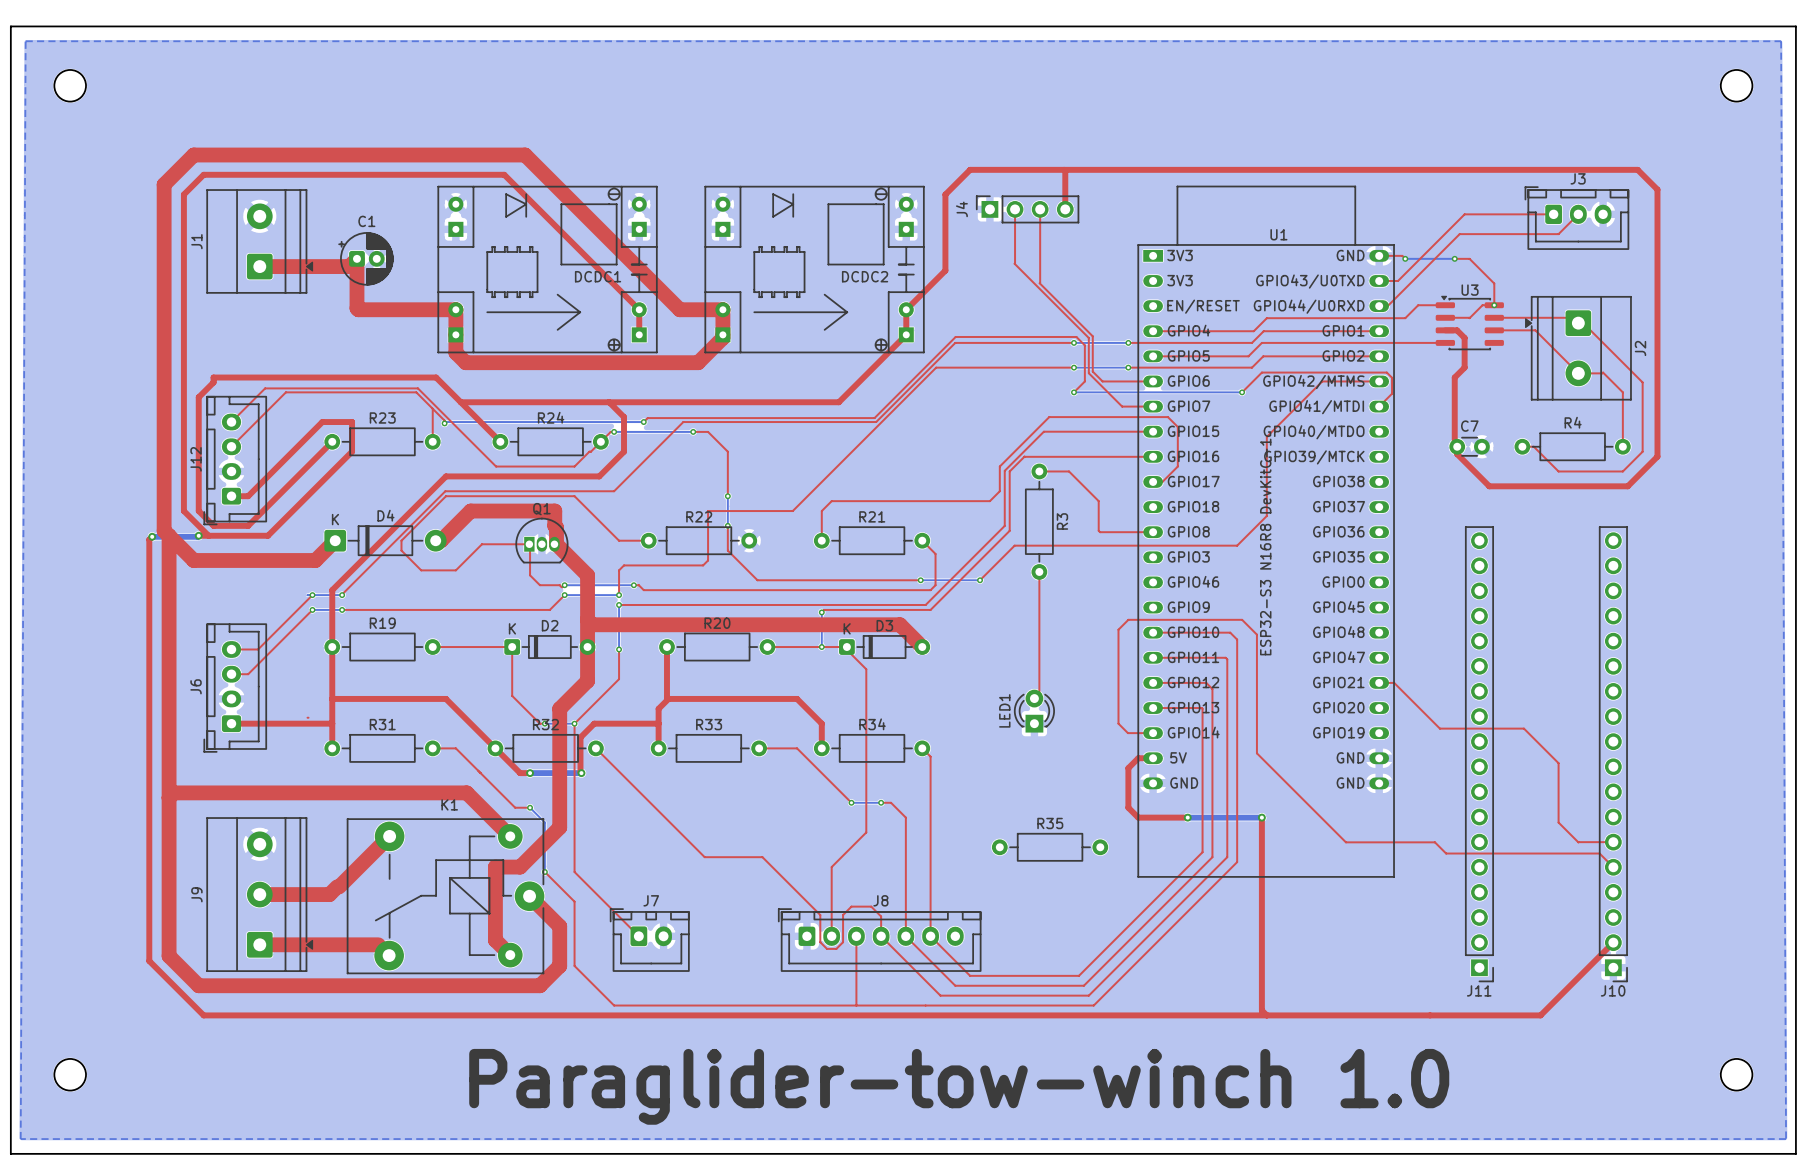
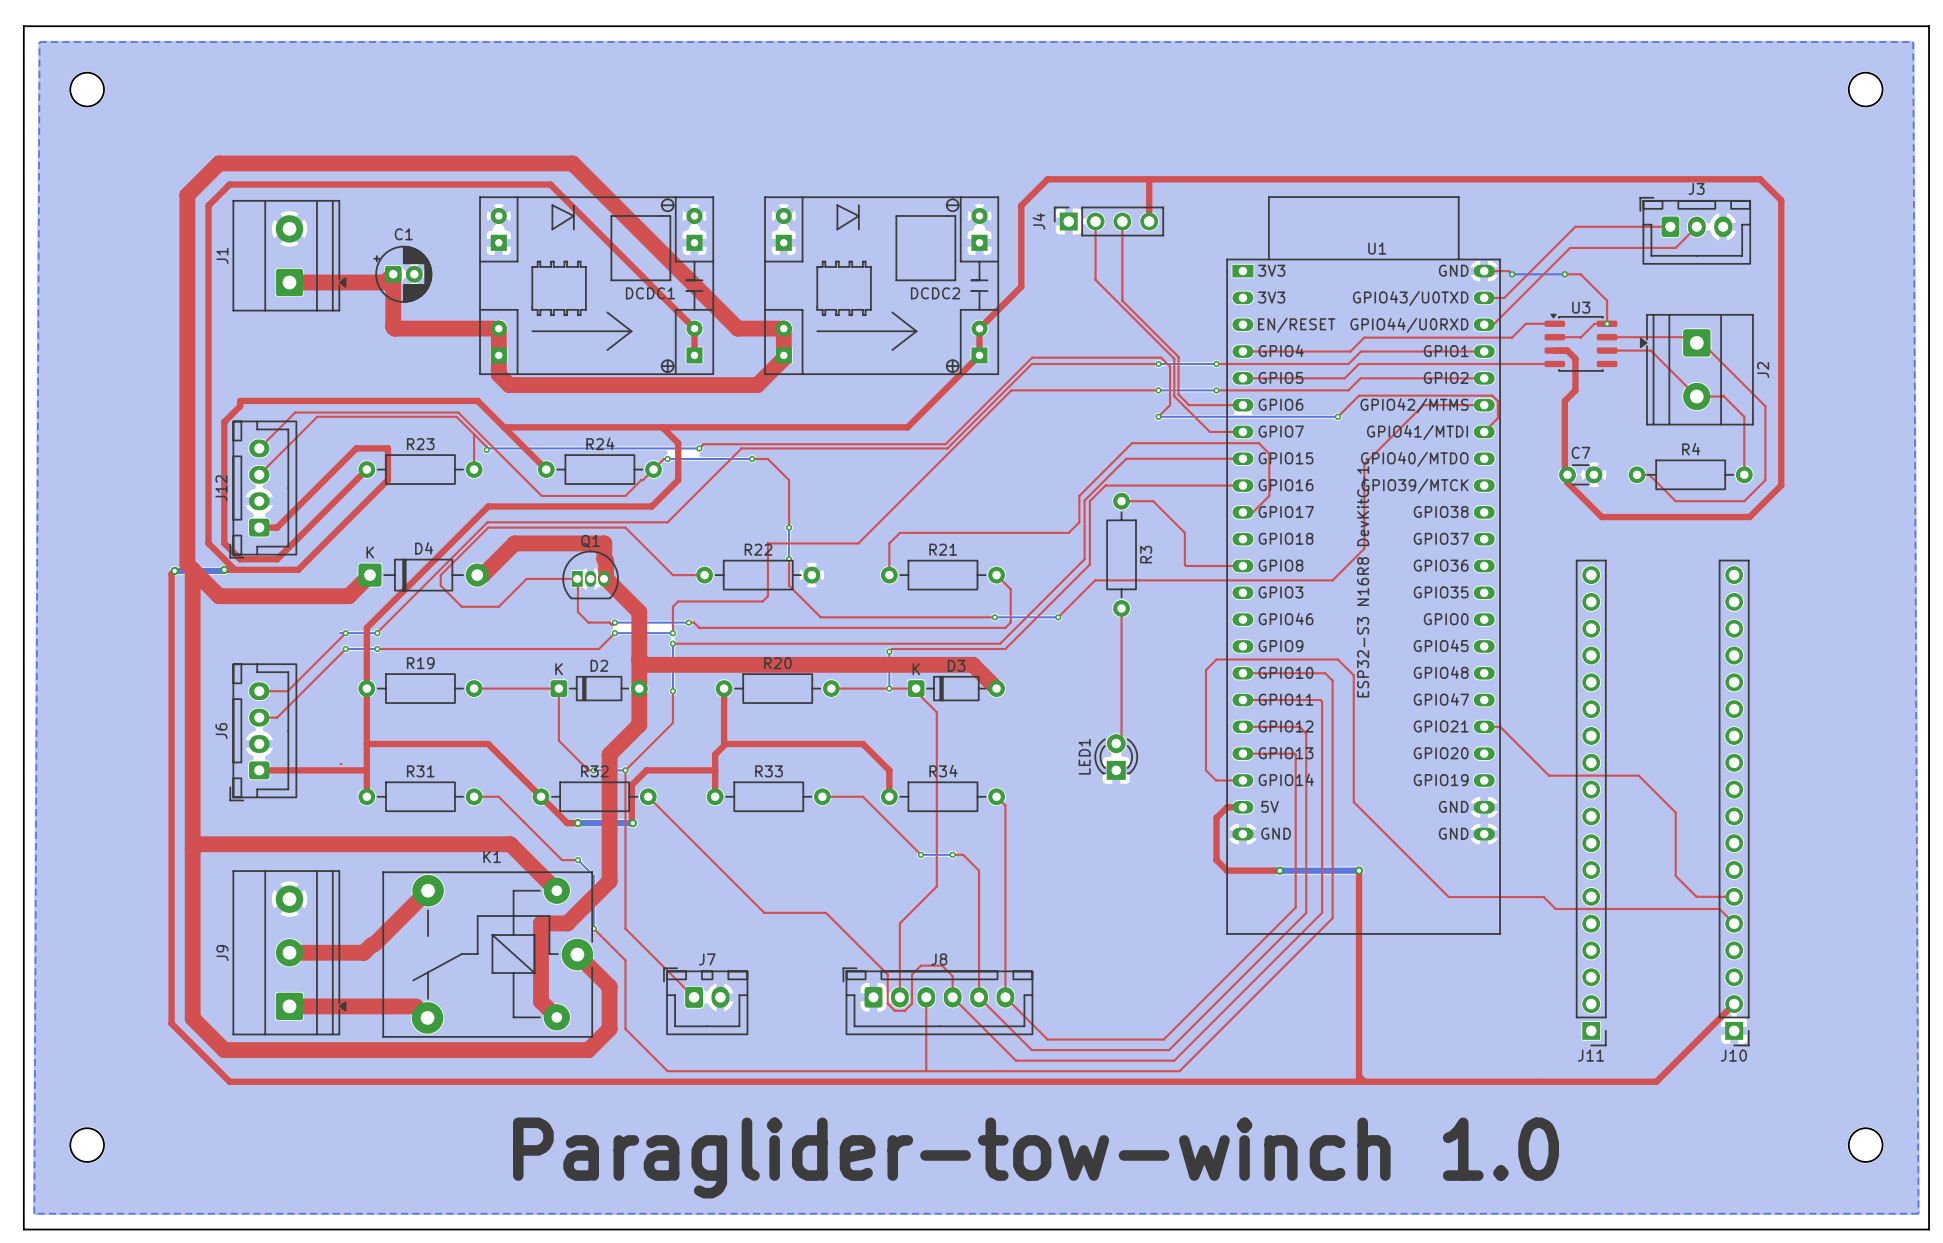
R35: (1050, 847) -> none
J8 footprint: [778, 908, 982, 972] -> [842, 967, 1034, 1035]

